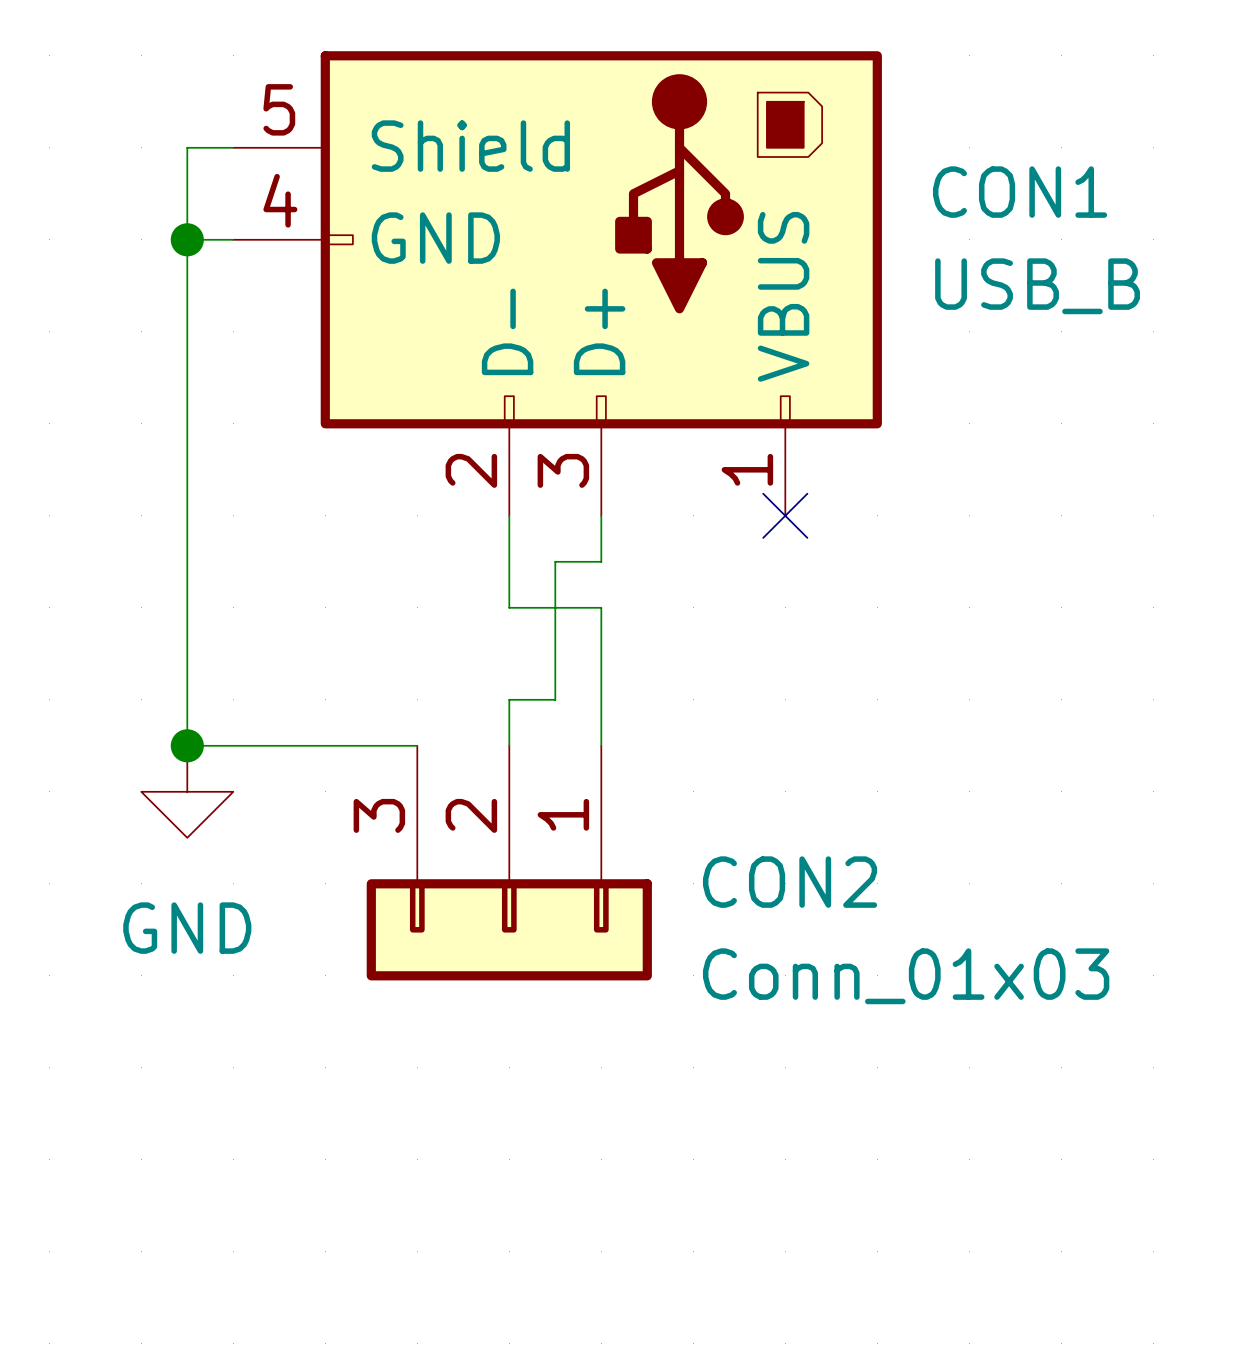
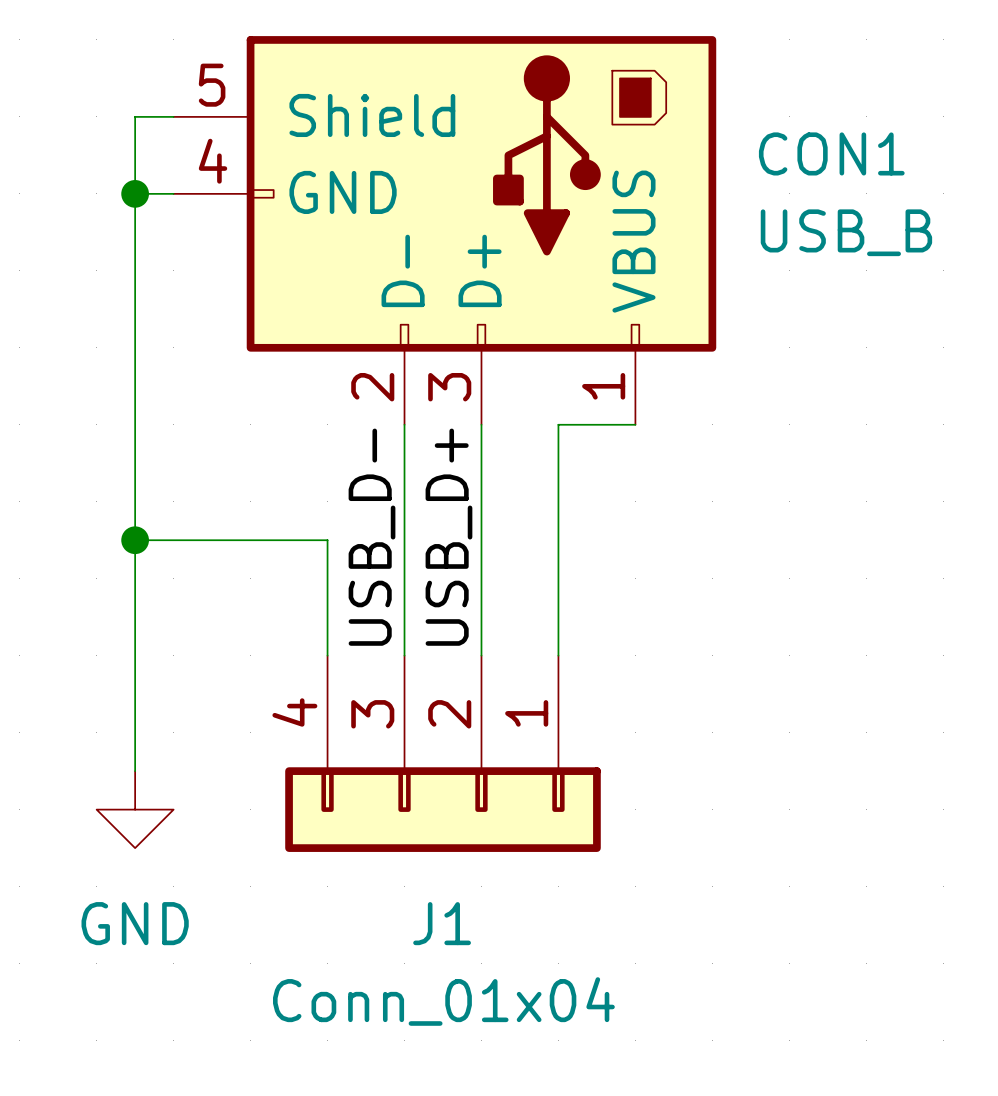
wire: none -> (635, 424) (558, 424) (558, 655)
no-connect mark: (785, 515) -> none
wire: (601, 561) (555, 561) (555, 699) (509, 699) -> (404, 501) (404, 578)
wire: (509, 607) (601, 607) -> (481, 463) (481, 501)
label: none -> USB_D- (372, 537)
label: none -> USB_D+ (448, 537)
wire: none -> (135, 540) (327, 540) (327, 655)
wire: (187, 745) (417, 745) -> (135, 617) (135, 771)
junction position: (187, 745) -> (135, 540)
power symbol position: GND (187, 791) -> GND (135, 809)
CON2: Conn_01x03 (509, 863) -> none
J1: none -> Conn_01x04 (442, 753)

